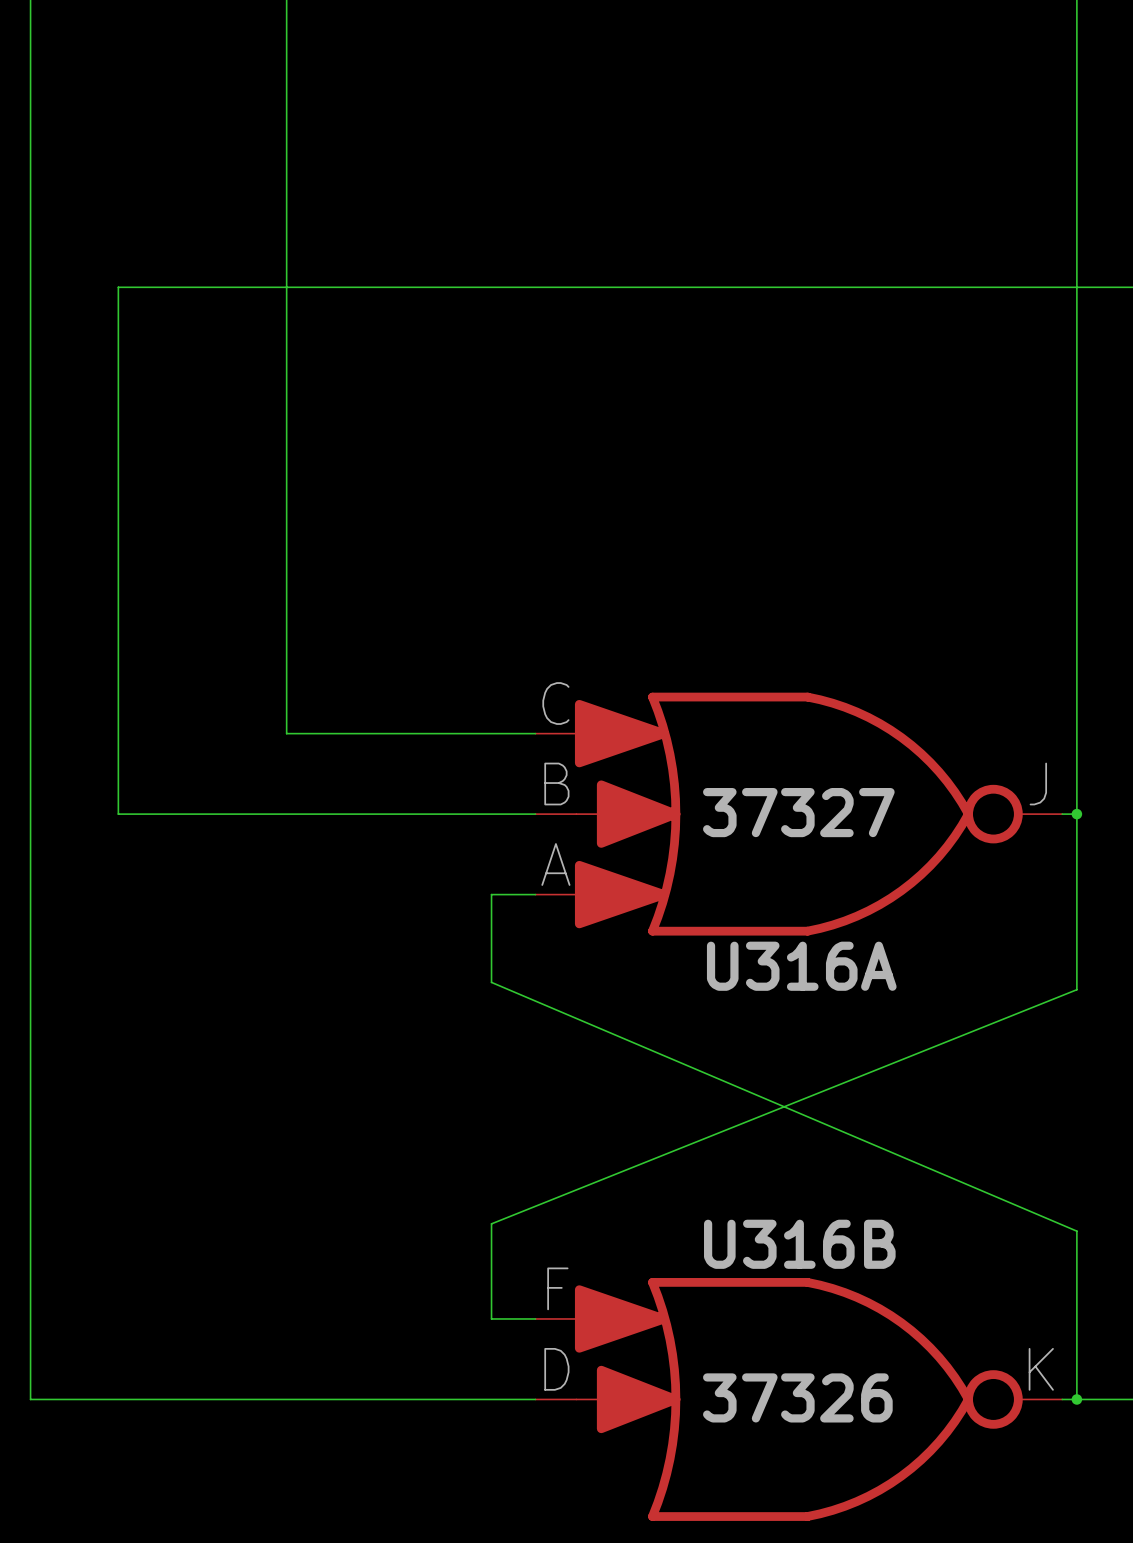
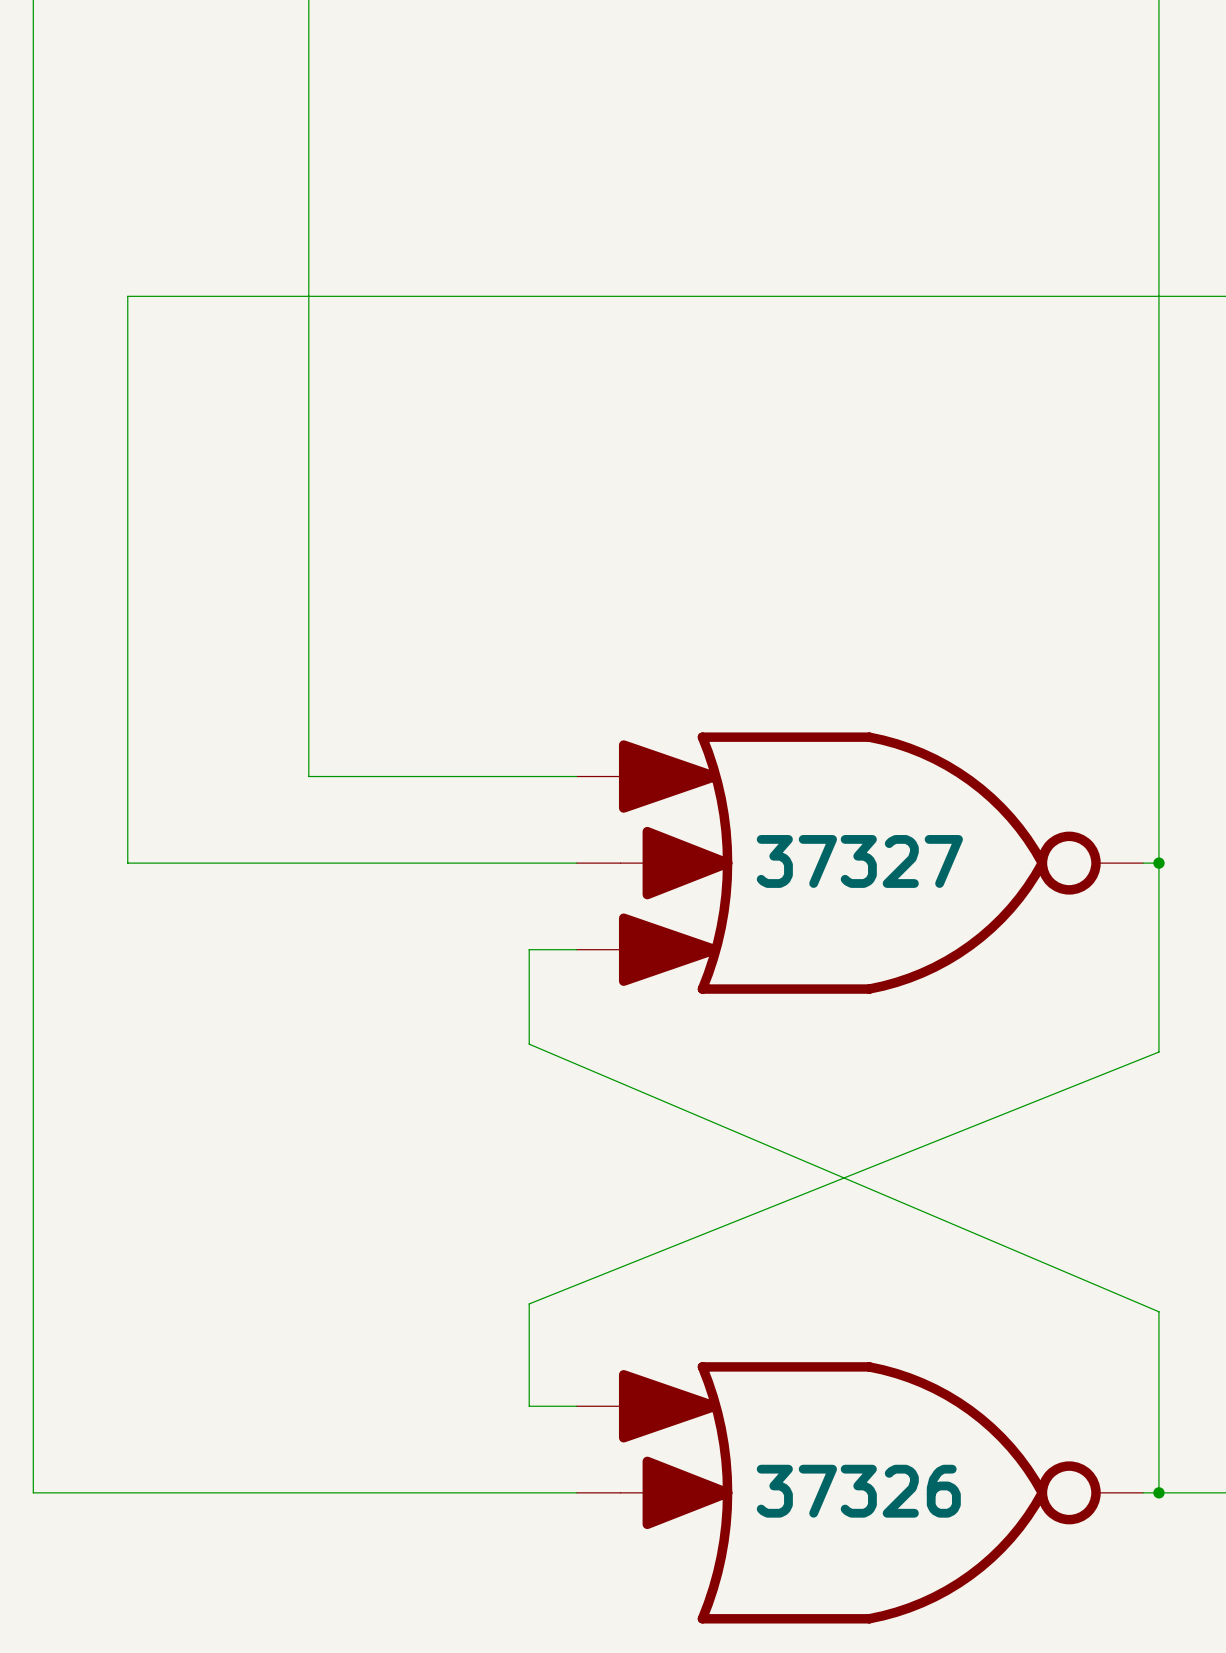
U316A pin name: C (555, 703) -> none
U316A pin name: B (556, 784) -> none
U316A pin name: J (1038, 784) -> none
U316A pin name: A (555, 864) -> none
U316A name: U316A (801, 966) -> none
U316B name: U316B (799, 1244) -> none
U316B pin name: F (557, 1288) -> none
U316B pin name: D (556, 1369) -> none
U316B pin name: K (1041, 1369) -> none

